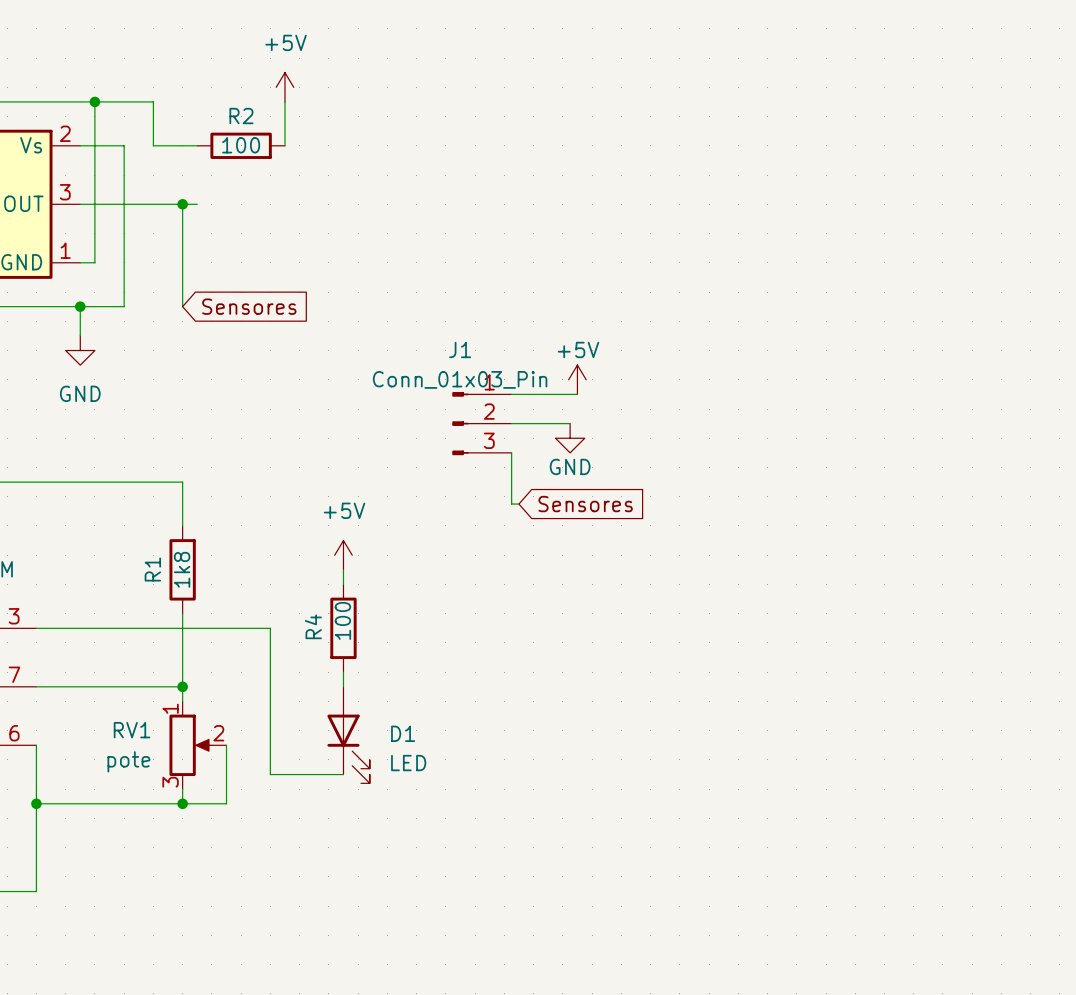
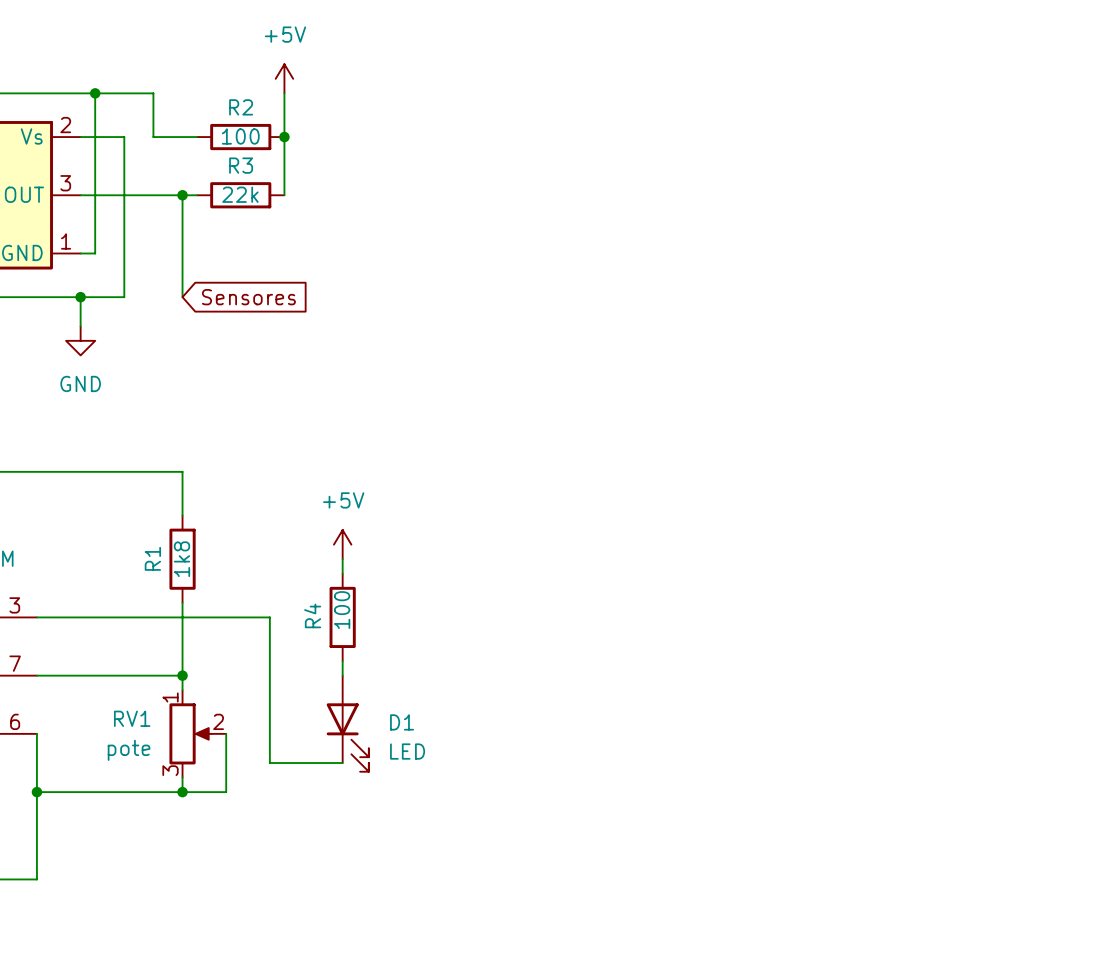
wire: none -> (284, 137) (284, 195)
junction: none -> (284, 137)
R3: none -> 22k (240, 195)
power symbol: +5V (577, 379) -> none
wire: (511, 394) (577, 394) -> none
J1: Conn_01x03_Pin (481, 423) -> none
wire: (511, 423) (570, 423) -> none
power symbol: GND (570, 438) -> none
wire: (511, 452) (511, 504) (518, 504) -> none
global label: Sensores (585, 504) -> none

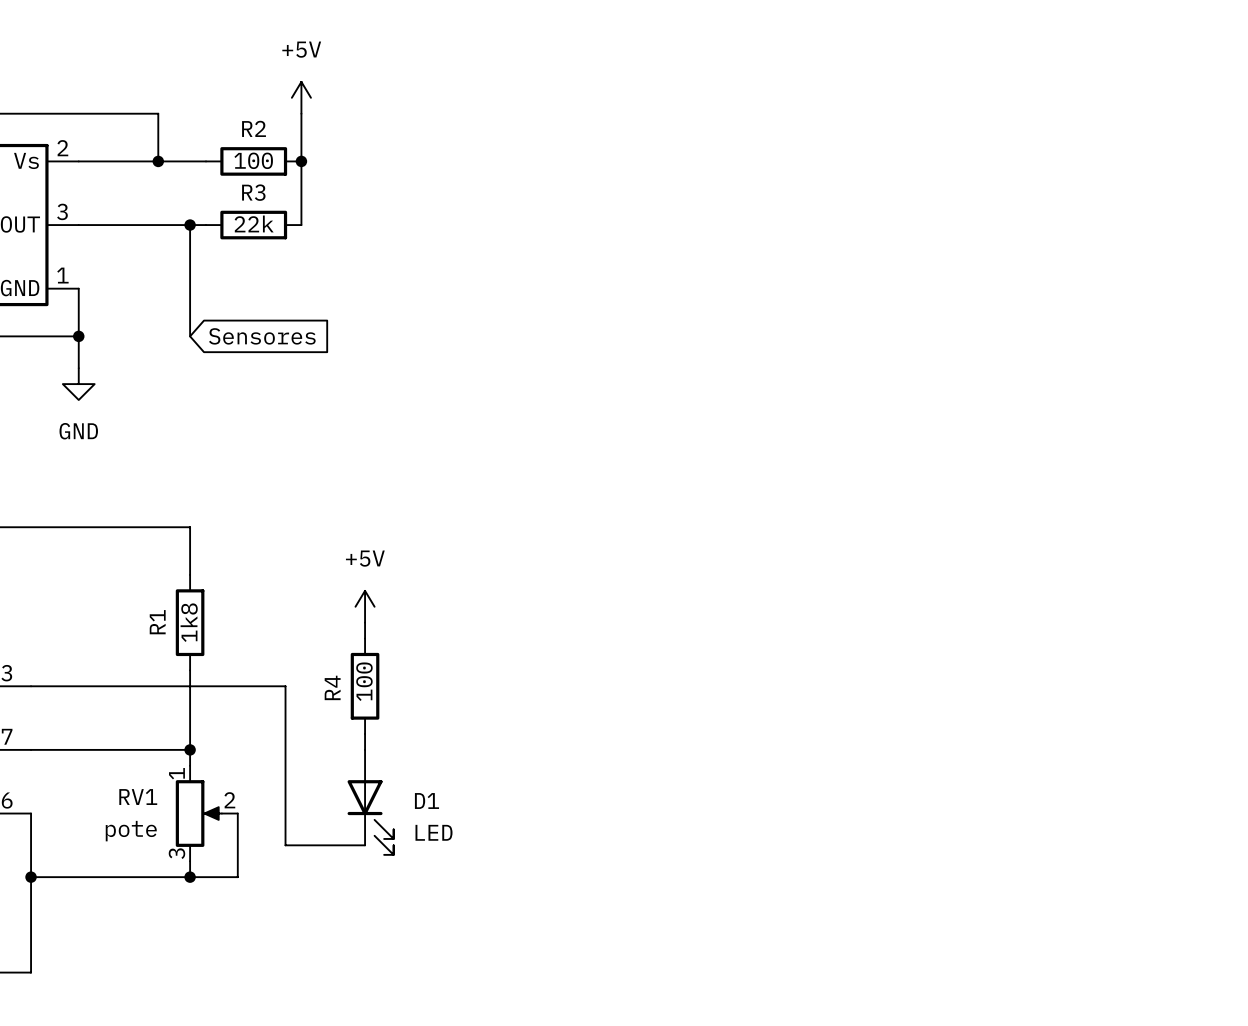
wire: (95, 93) (95, 253) (80, 253) -> none
junction: (95, 93) -> none
wire: (124, 137) (124, 297) (80, 297) -> (78, 288) (78, 336)
wire: none -> (126, 161) (158, 161)
junction: none -> (158, 161)

